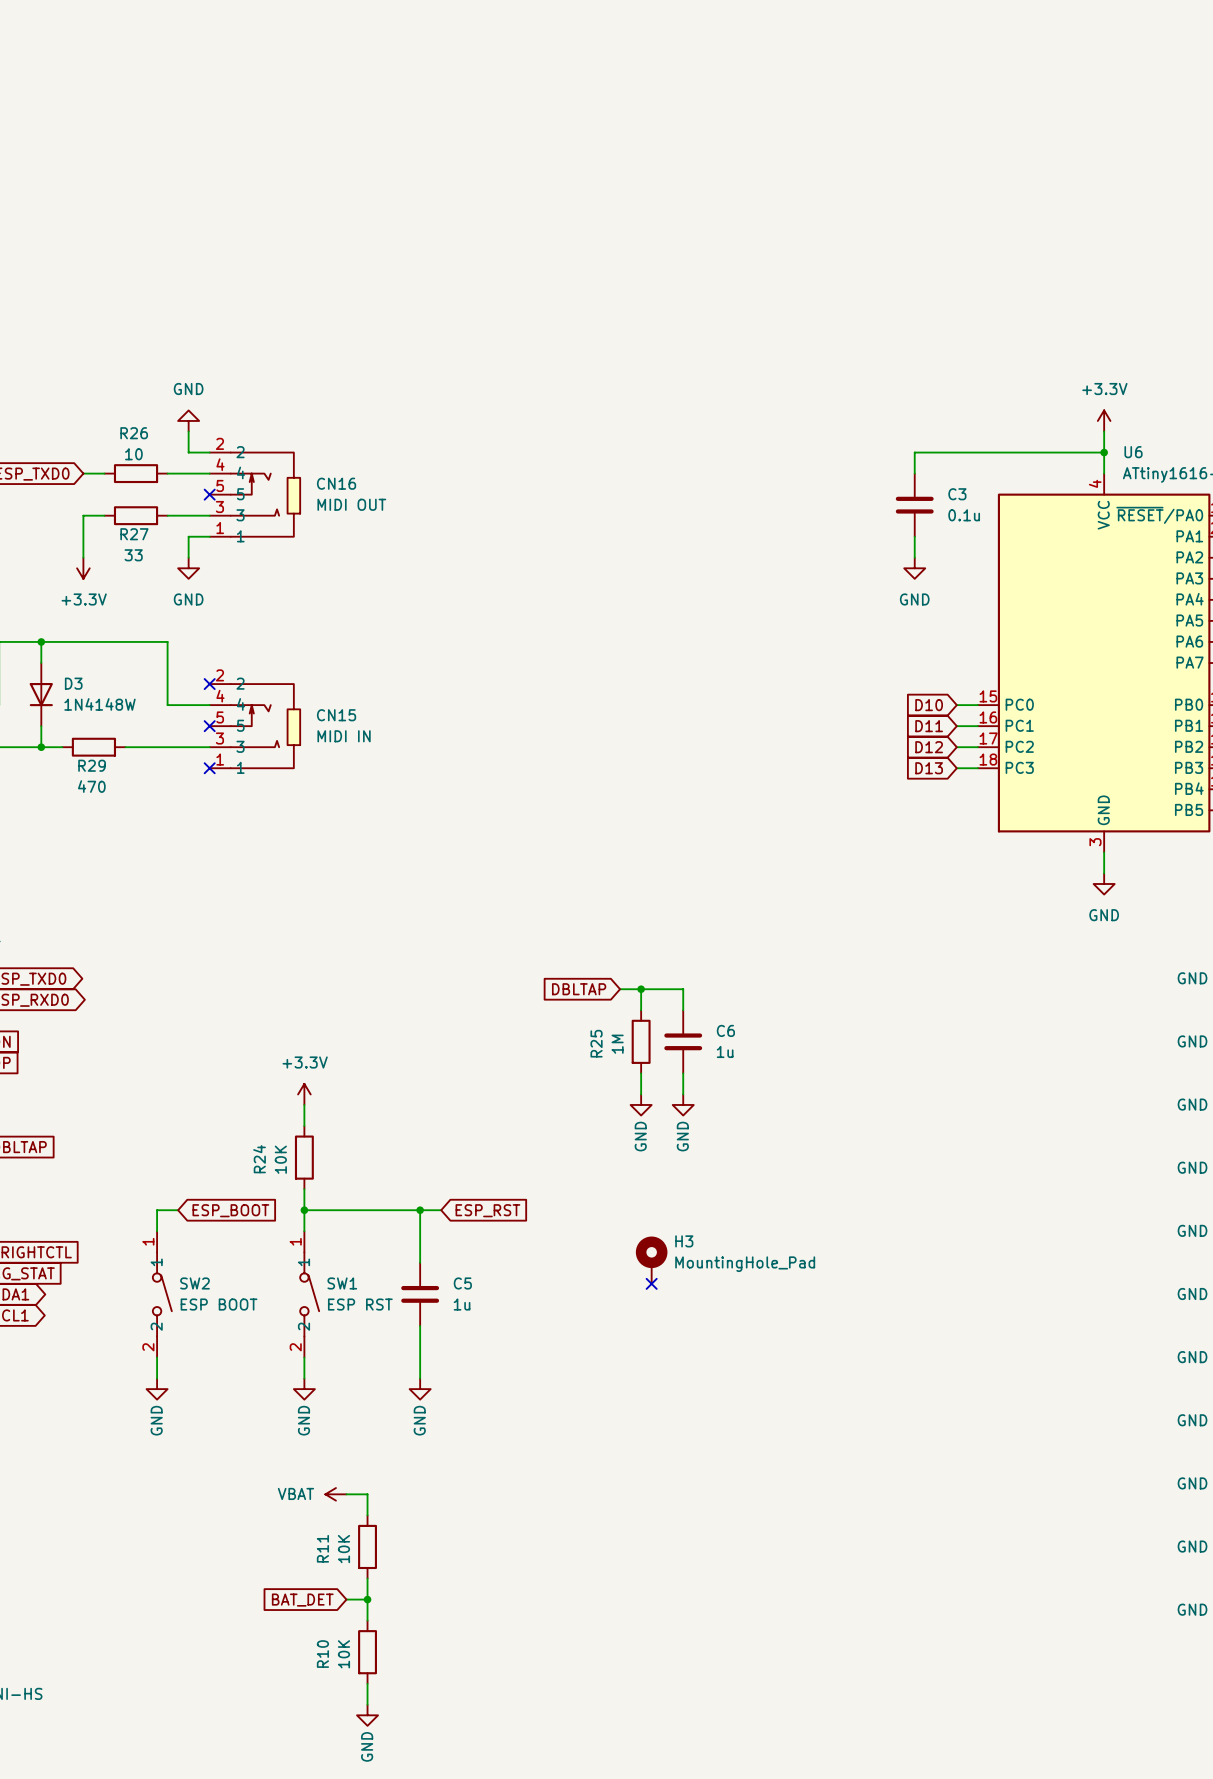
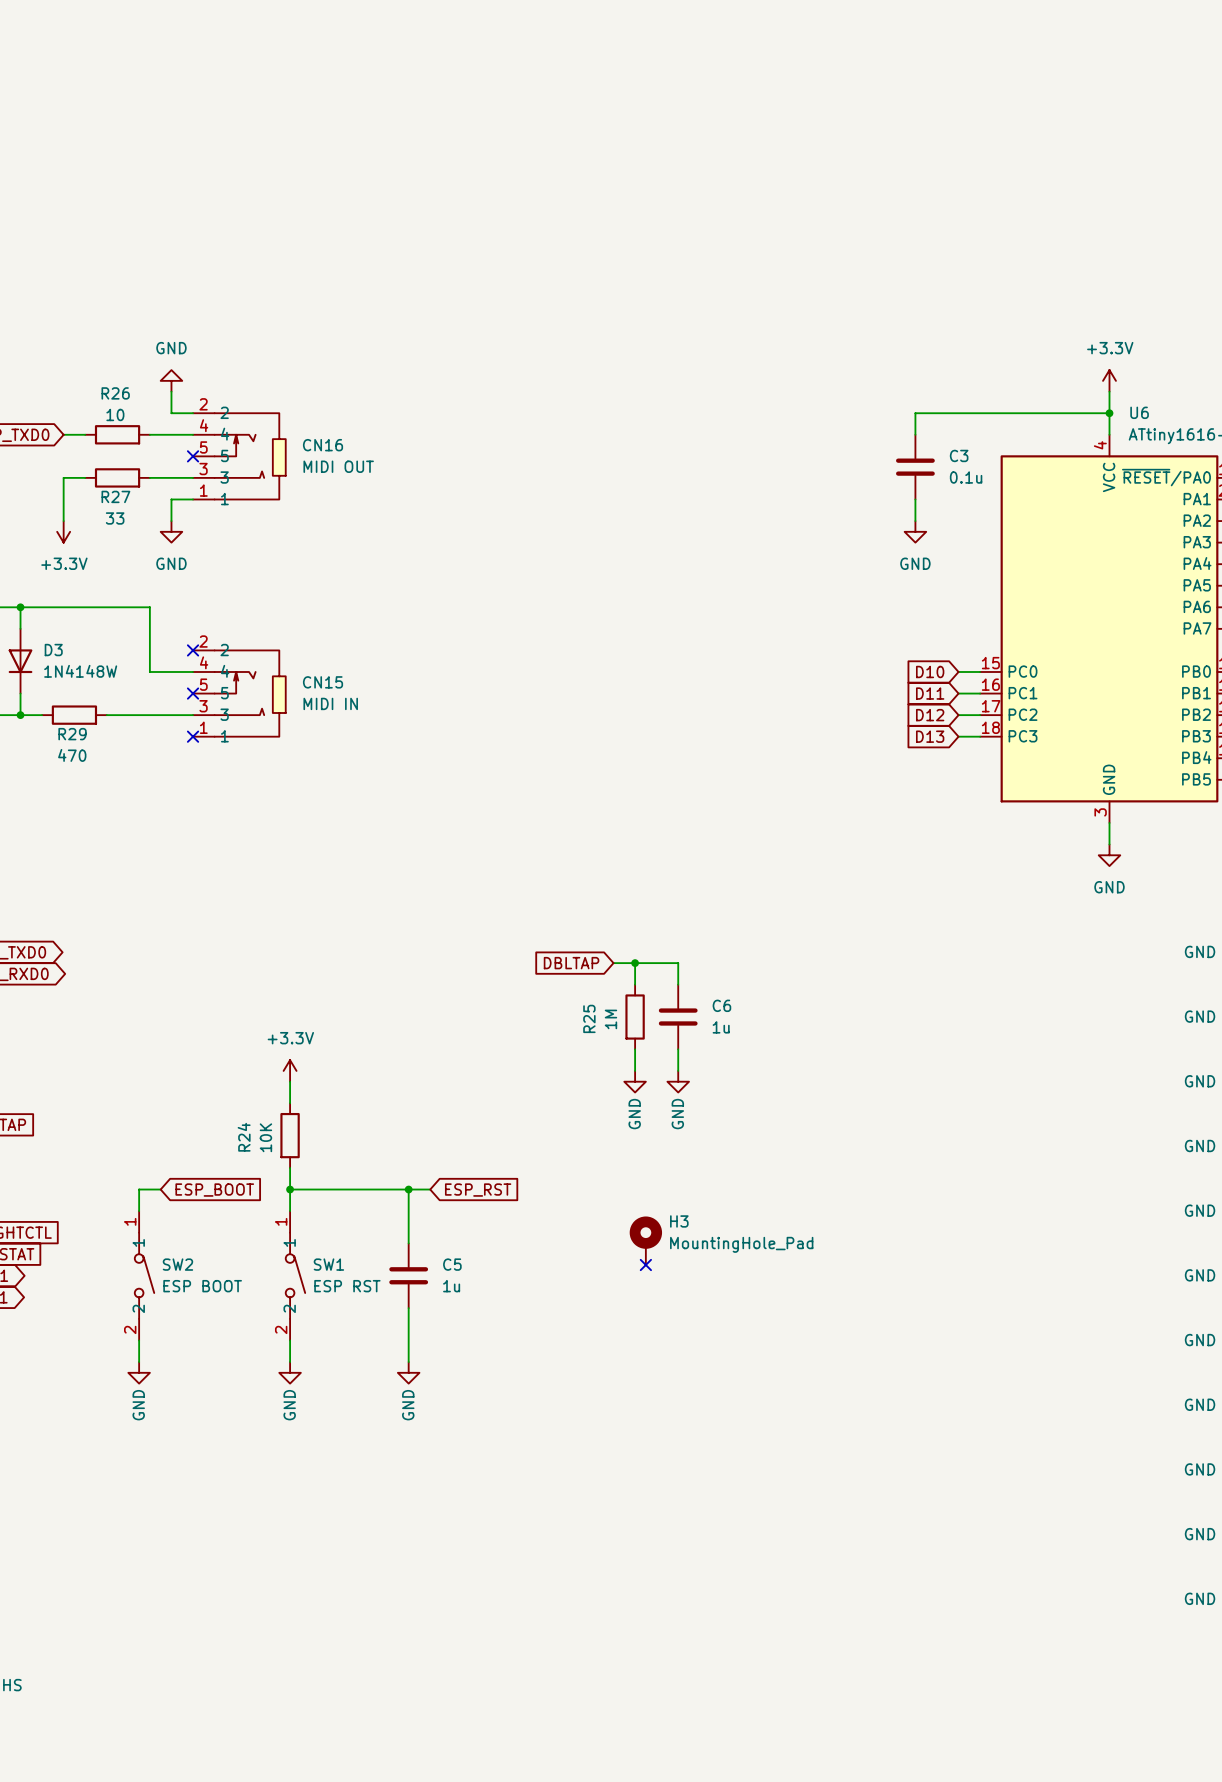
power symbol: VBAT (335, 1494) -> none
wire: (346, 1494) (367, 1494) (367, 1515) -> none
R11: 10K (367, 1546) -> none
wire: (367, 1578) (367, 1620) -> none
wire: (346, 1599) (367, 1599) -> none
junction: (367, 1599) -> none
global label: BAT_DET (302, 1600) -> none
R10: 10K (367, 1652) -> none
wire: (367, 1683) (367, 1704) -> none
power symbol: GND (367, 1715) -> none

